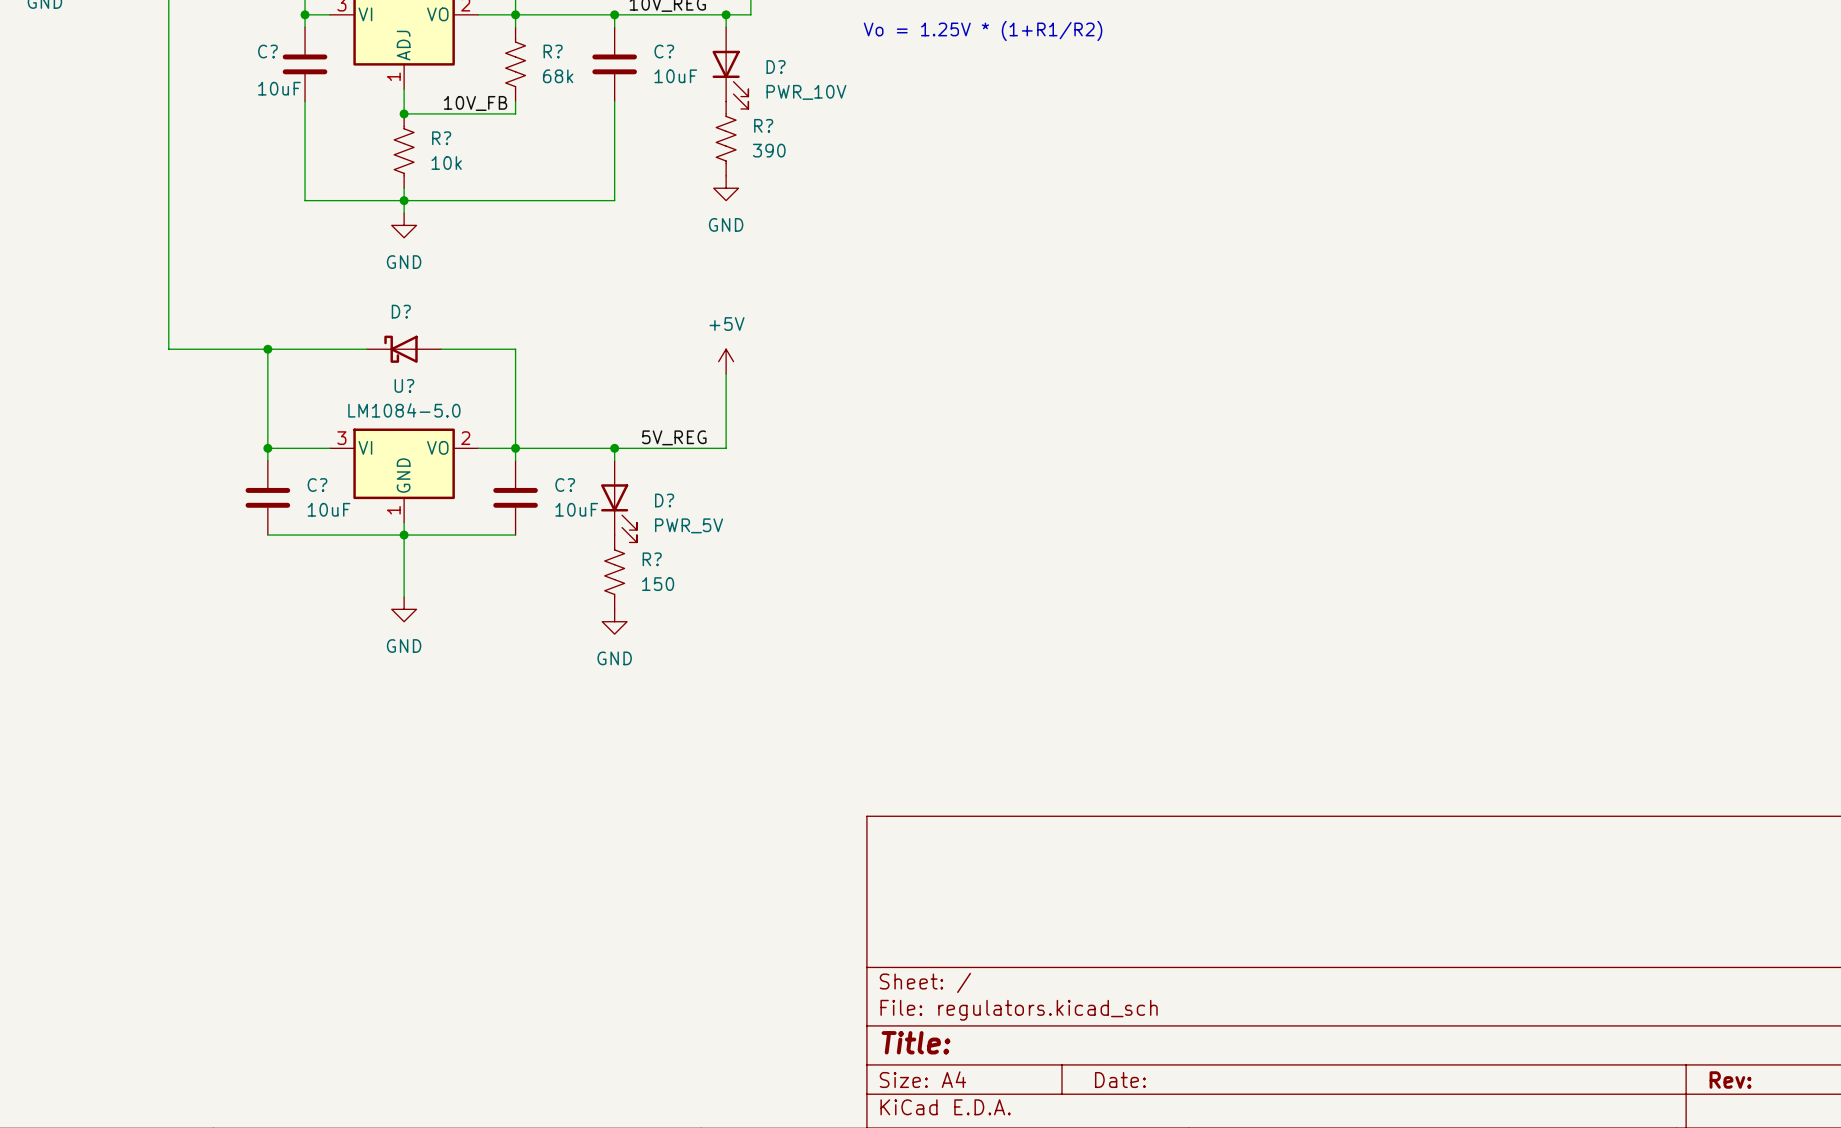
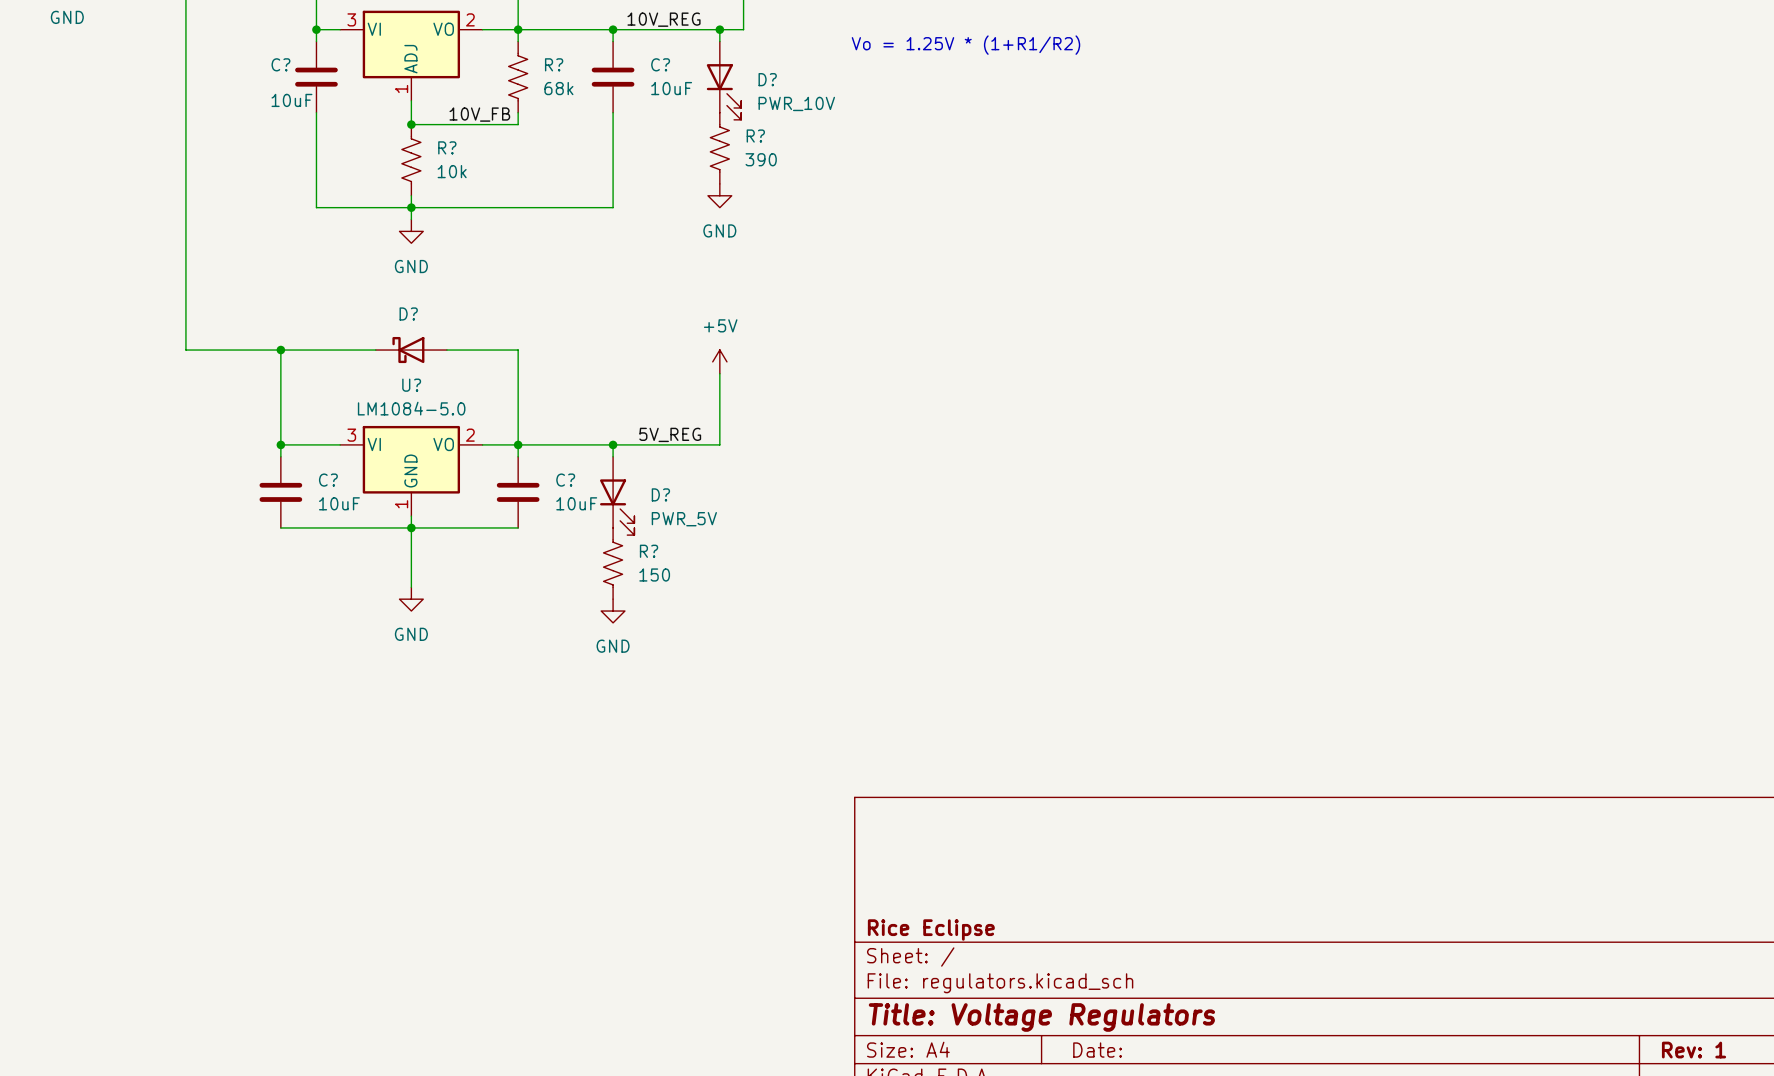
title block: none -> Rice Eclipse (931, 930)
title block: Title: (916, 1042) -> Title: Voltage Regulators (1041, 1017)
title block: Rev: (1730, 1080) -> Rev: 1 (1694, 1050)

